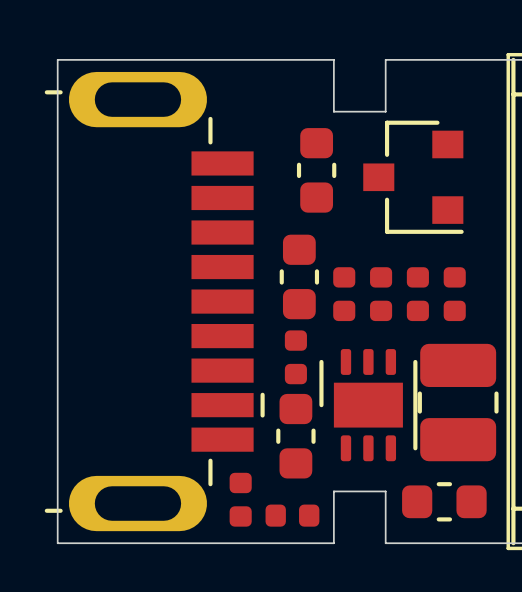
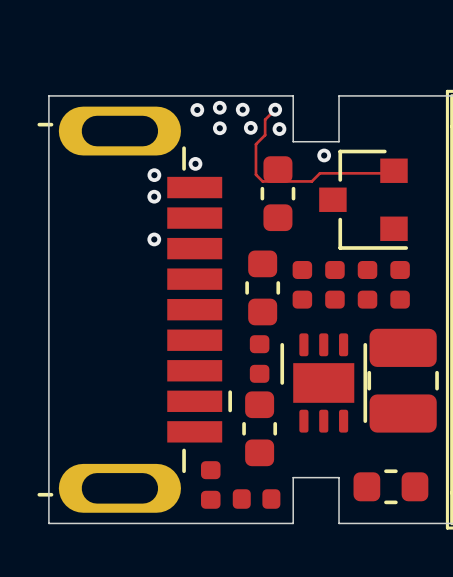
via: none -> (219, 107)
via: none -> (197, 109)
via: none -> (242, 109)
track: none -> (275, 109) (265, 119) (265, 135) (255, 144) (255, 174) (262, 181) (311, 181) (319, 173) (391, 173) (393, 170)
via: none -> (275, 109)
via: none -> (219, 128)
via: none -> (250, 127)
via: none -> (279, 129)
via: none -> (324, 155)
via: none -> (195, 163)
via: none -> (154, 175)
via: none -> (154, 196)
via: none -> (154, 239)
part position: (344, 294) -> (302, 284)
part position: (381, 294) -> (334, 284)
part position: (417, 294) -> (367, 284)
part position: (454, 294) -> (400, 284)
part position: (458, 402) -> (403, 380)
part position: (368, 405) -> (323, 382)

